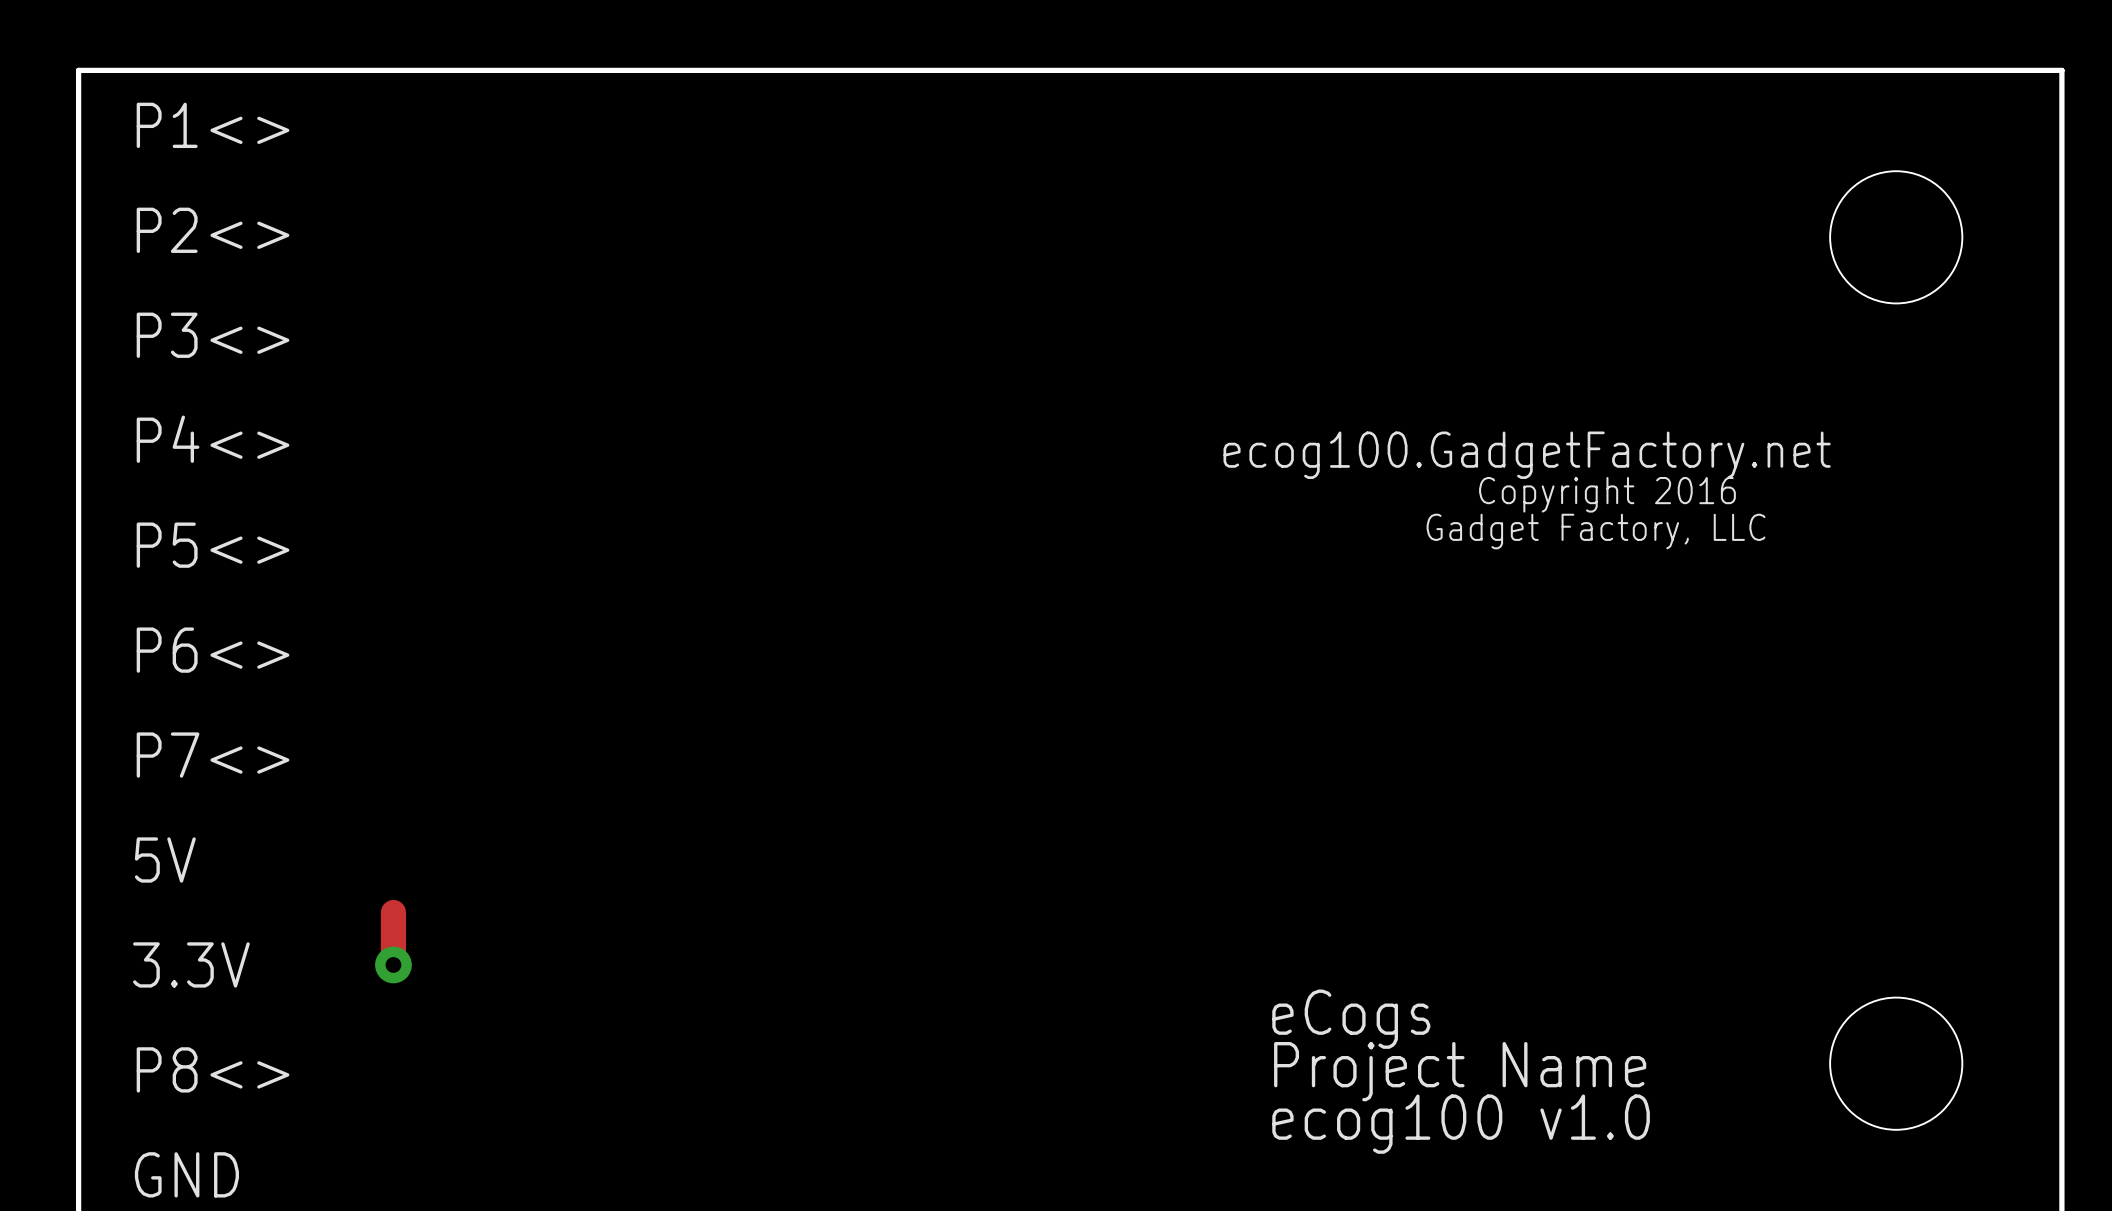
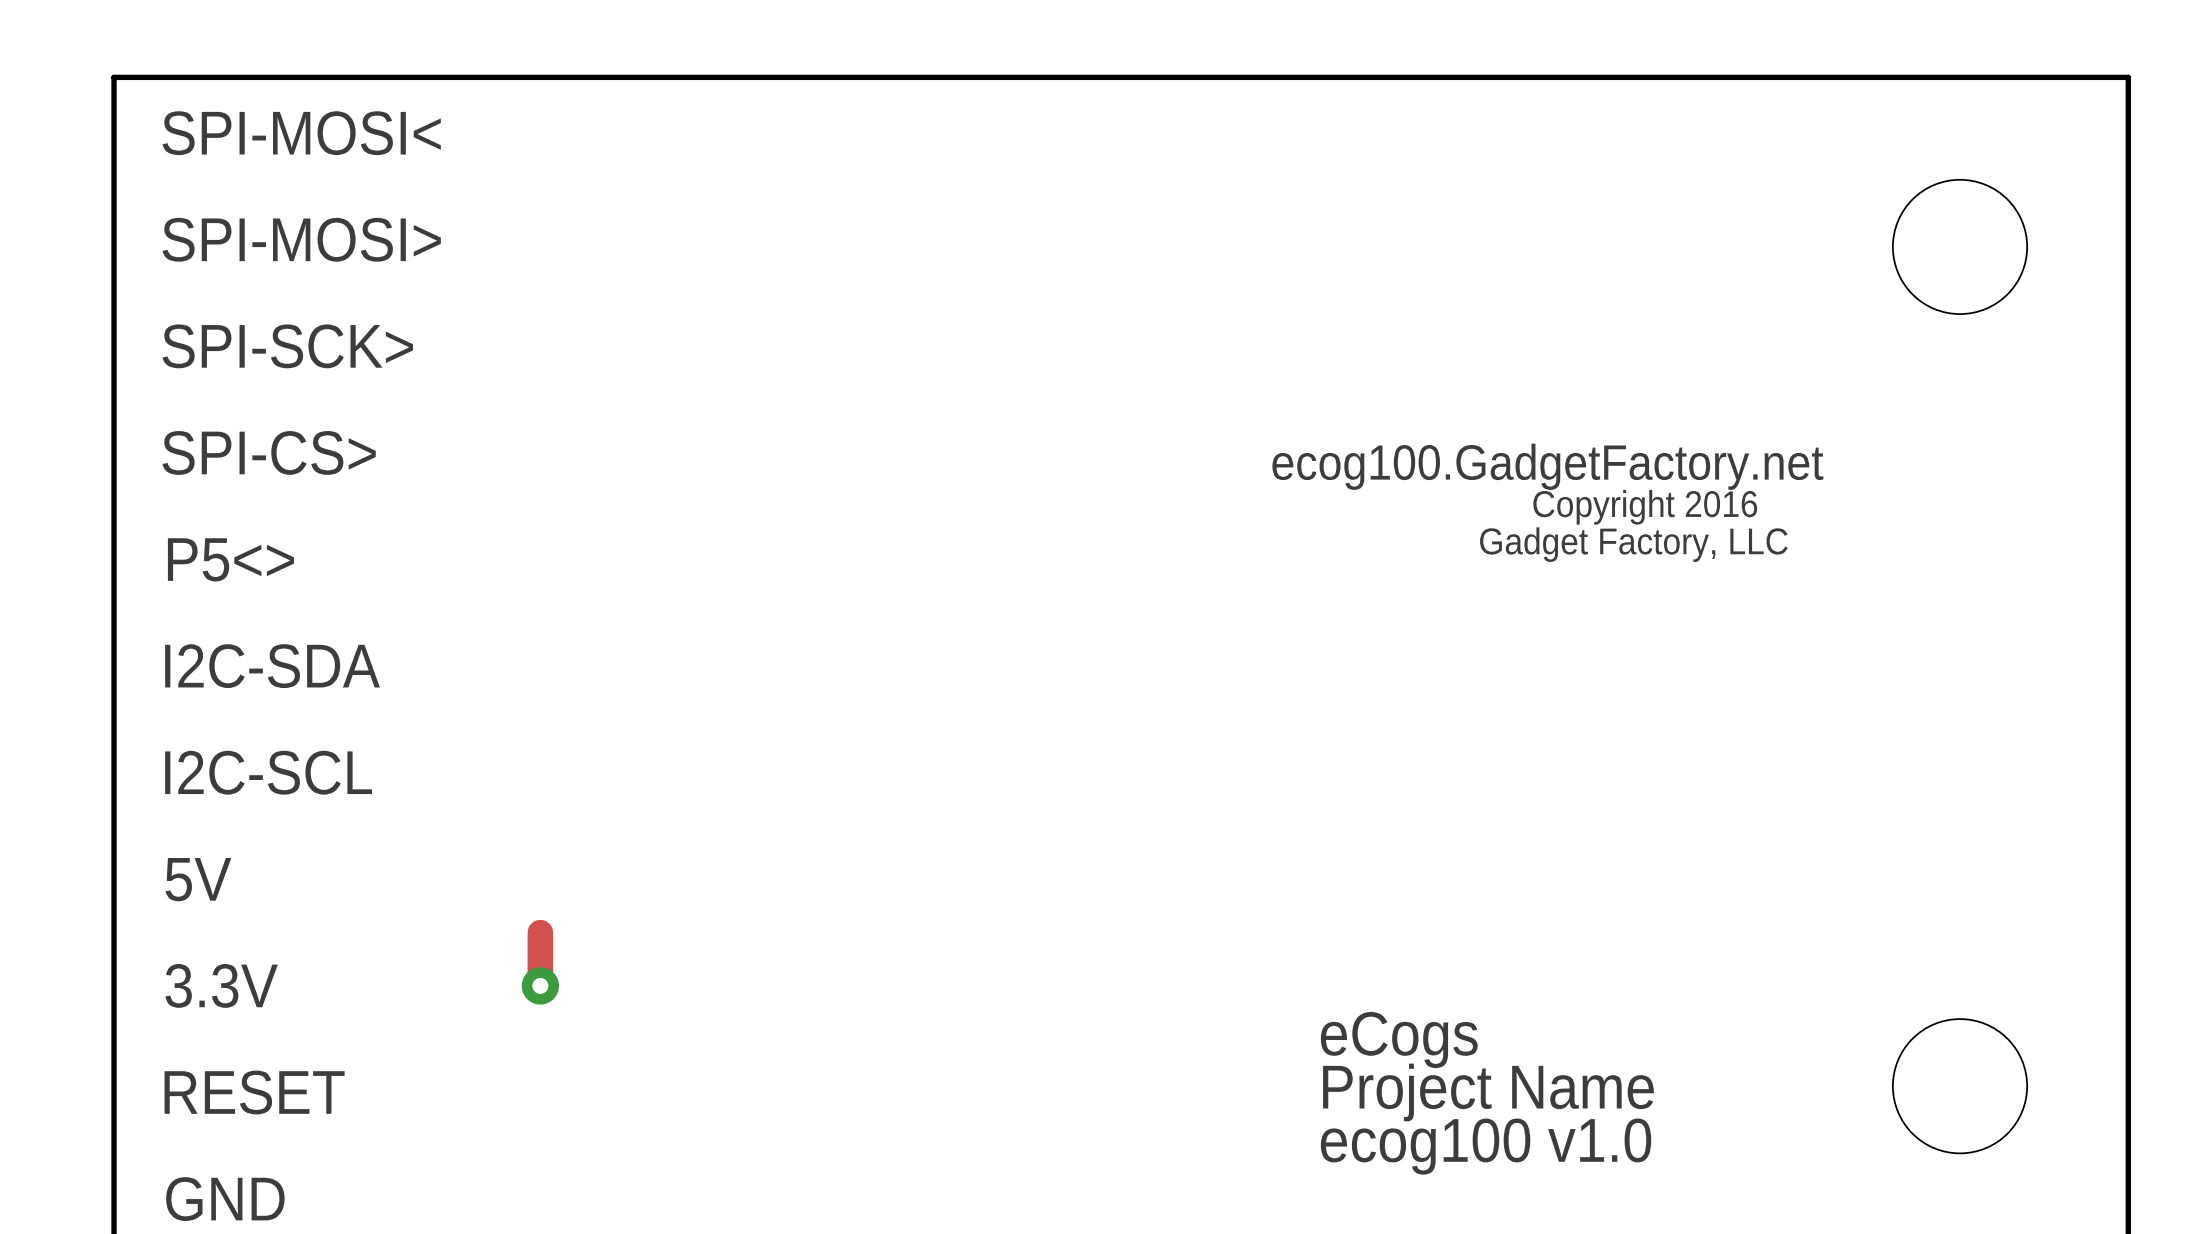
text: P1<> (213, 125) -> SPI-MOSI< (301, 133)
text: P2<> (213, 230) -> SPI-MOSI> (301, 239)
text: P3<> (213, 335) -> SPI-SCK> (287, 346)
text: P4<> (213, 439) -> SPI-CS> (269, 452)
text: P6<> (213, 650) -> I2C-SDA (272, 666)
text: P7<> (213, 755) -> I2C-SCL (268, 772)
track: (393, 912) (393, 964) -> (540, 932) (540, 985)
via position: (393, 964) -> (540, 985)
text: P8<> (213, 1069) -> RESET (254, 1092)

